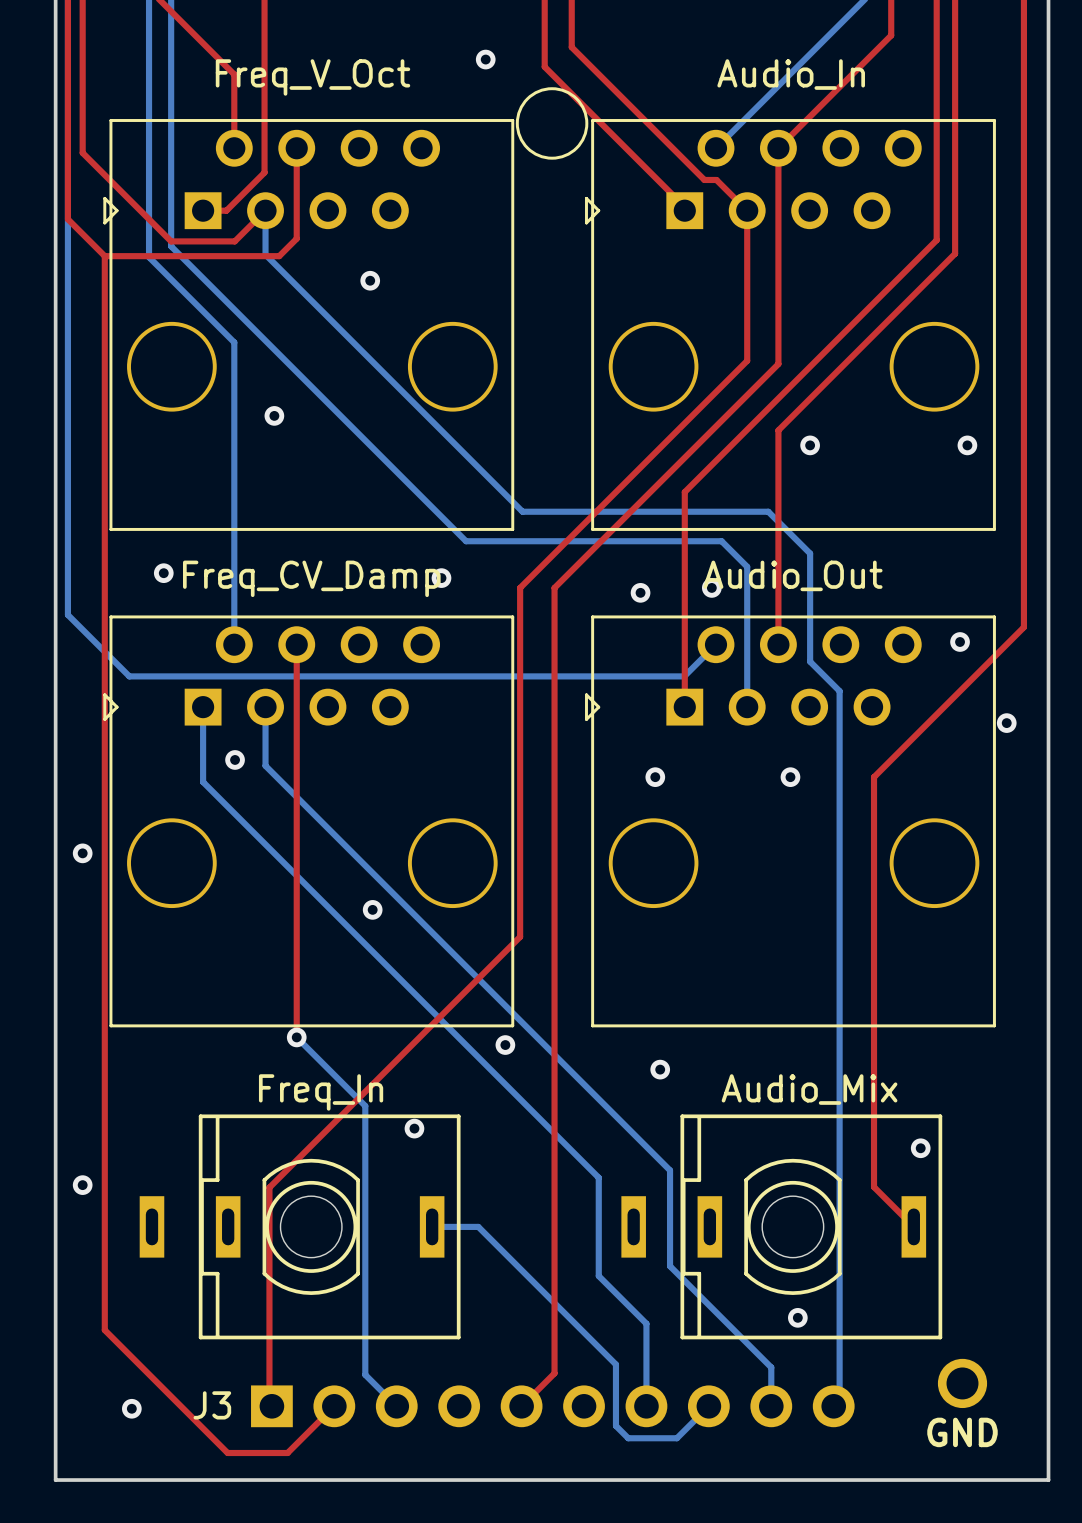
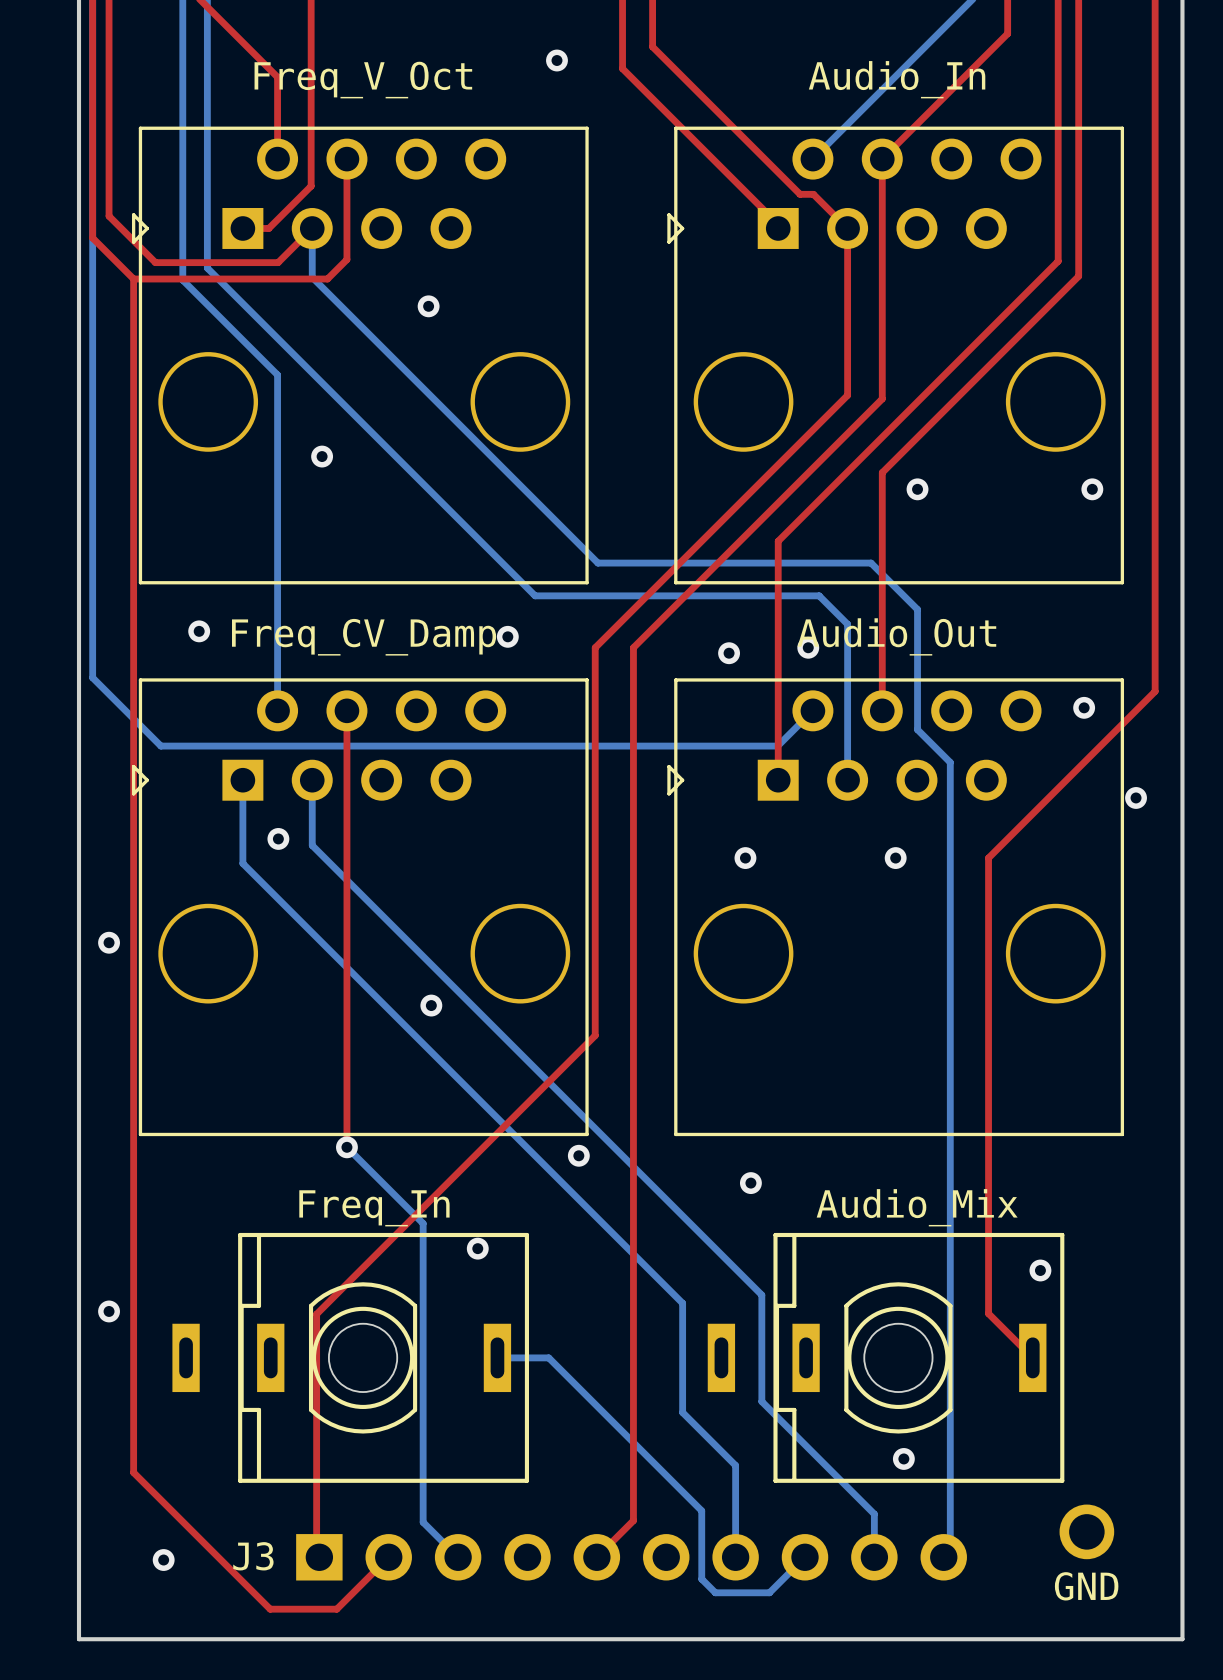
drawing: [515, 87, 589, 160] -> none
top track: (82, 152) (171, 241) -> (109, 164) (109, 216) (155, 262) (207, 262)

